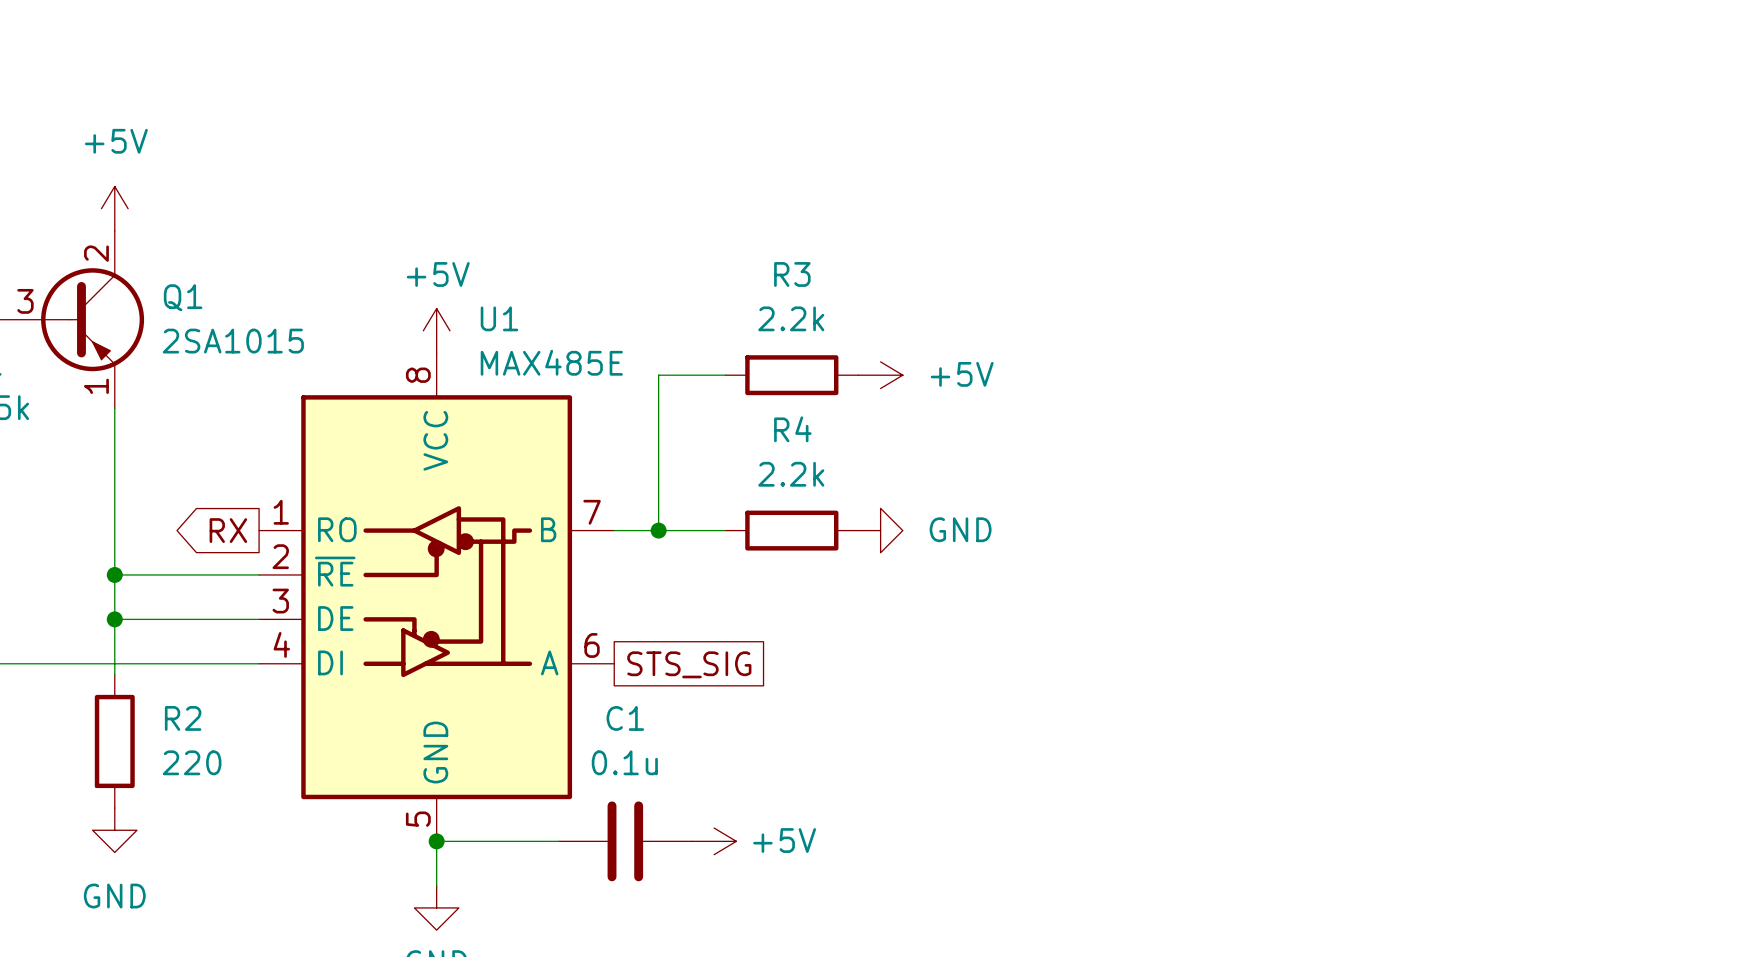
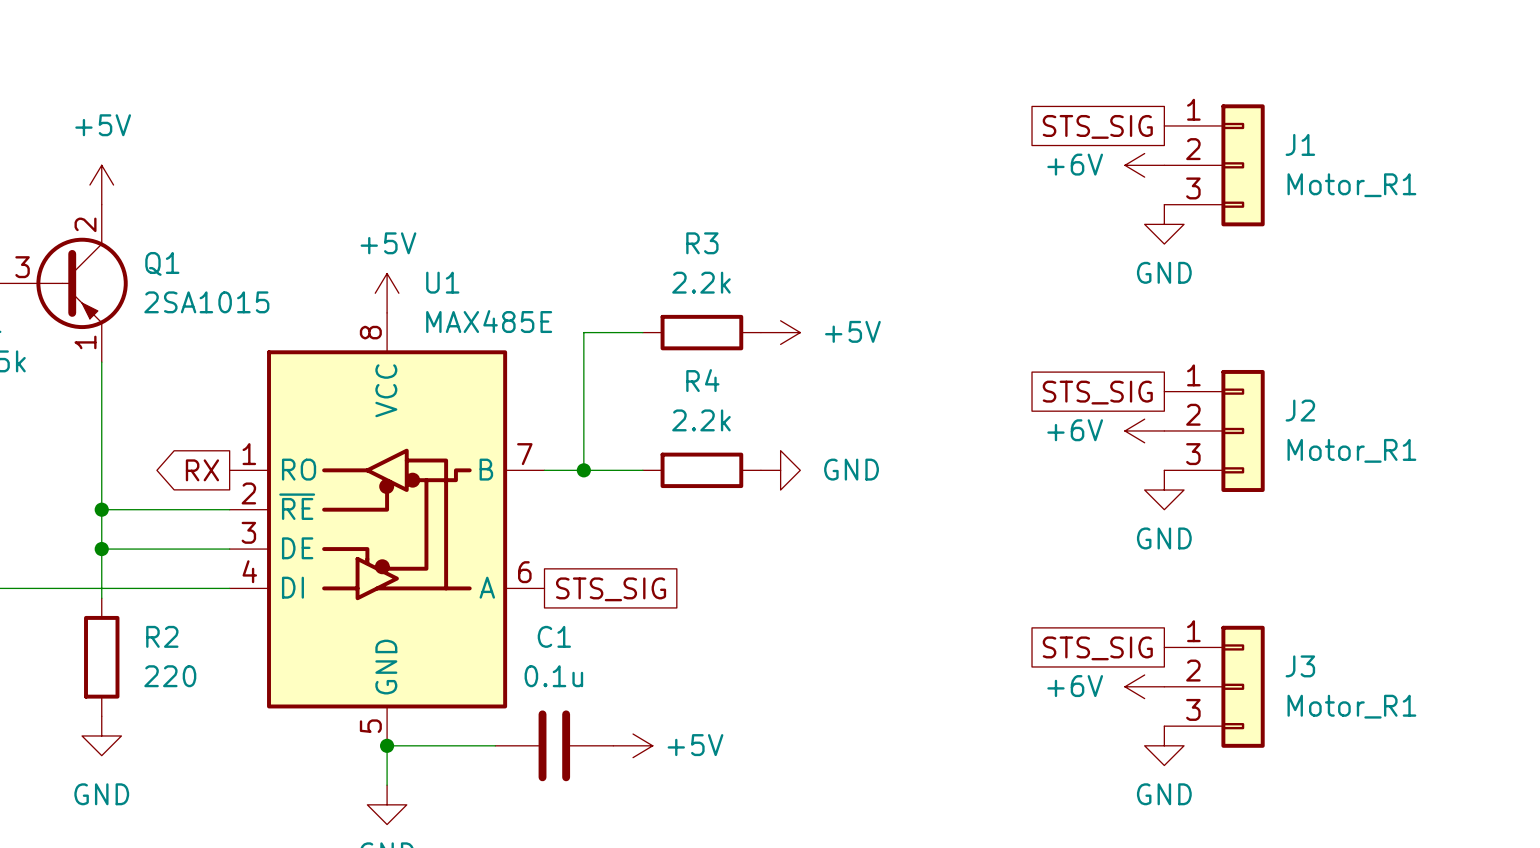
global label: none -> STS_SIG (1097, 126)
power symbol: none -> +6V (1144, 165)
J1: none -> Motor_R1 (1214, 165)
power symbol: none -> GND (1164, 224)
global label: none -> STS_SIG (1097, 392)
power symbol: none -> +6V (1144, 430)
J2: none -> Motor_R1 (1214, 430)
power symbol: none -> GND (1164, 490)
global label: none -> STS_SIG (1097, 648)
power symbol: none -> +6V (1144, 686)
J3: none -> Motor_R1 (1214, 686)
power symbol: none -> GND (1164, 745)

